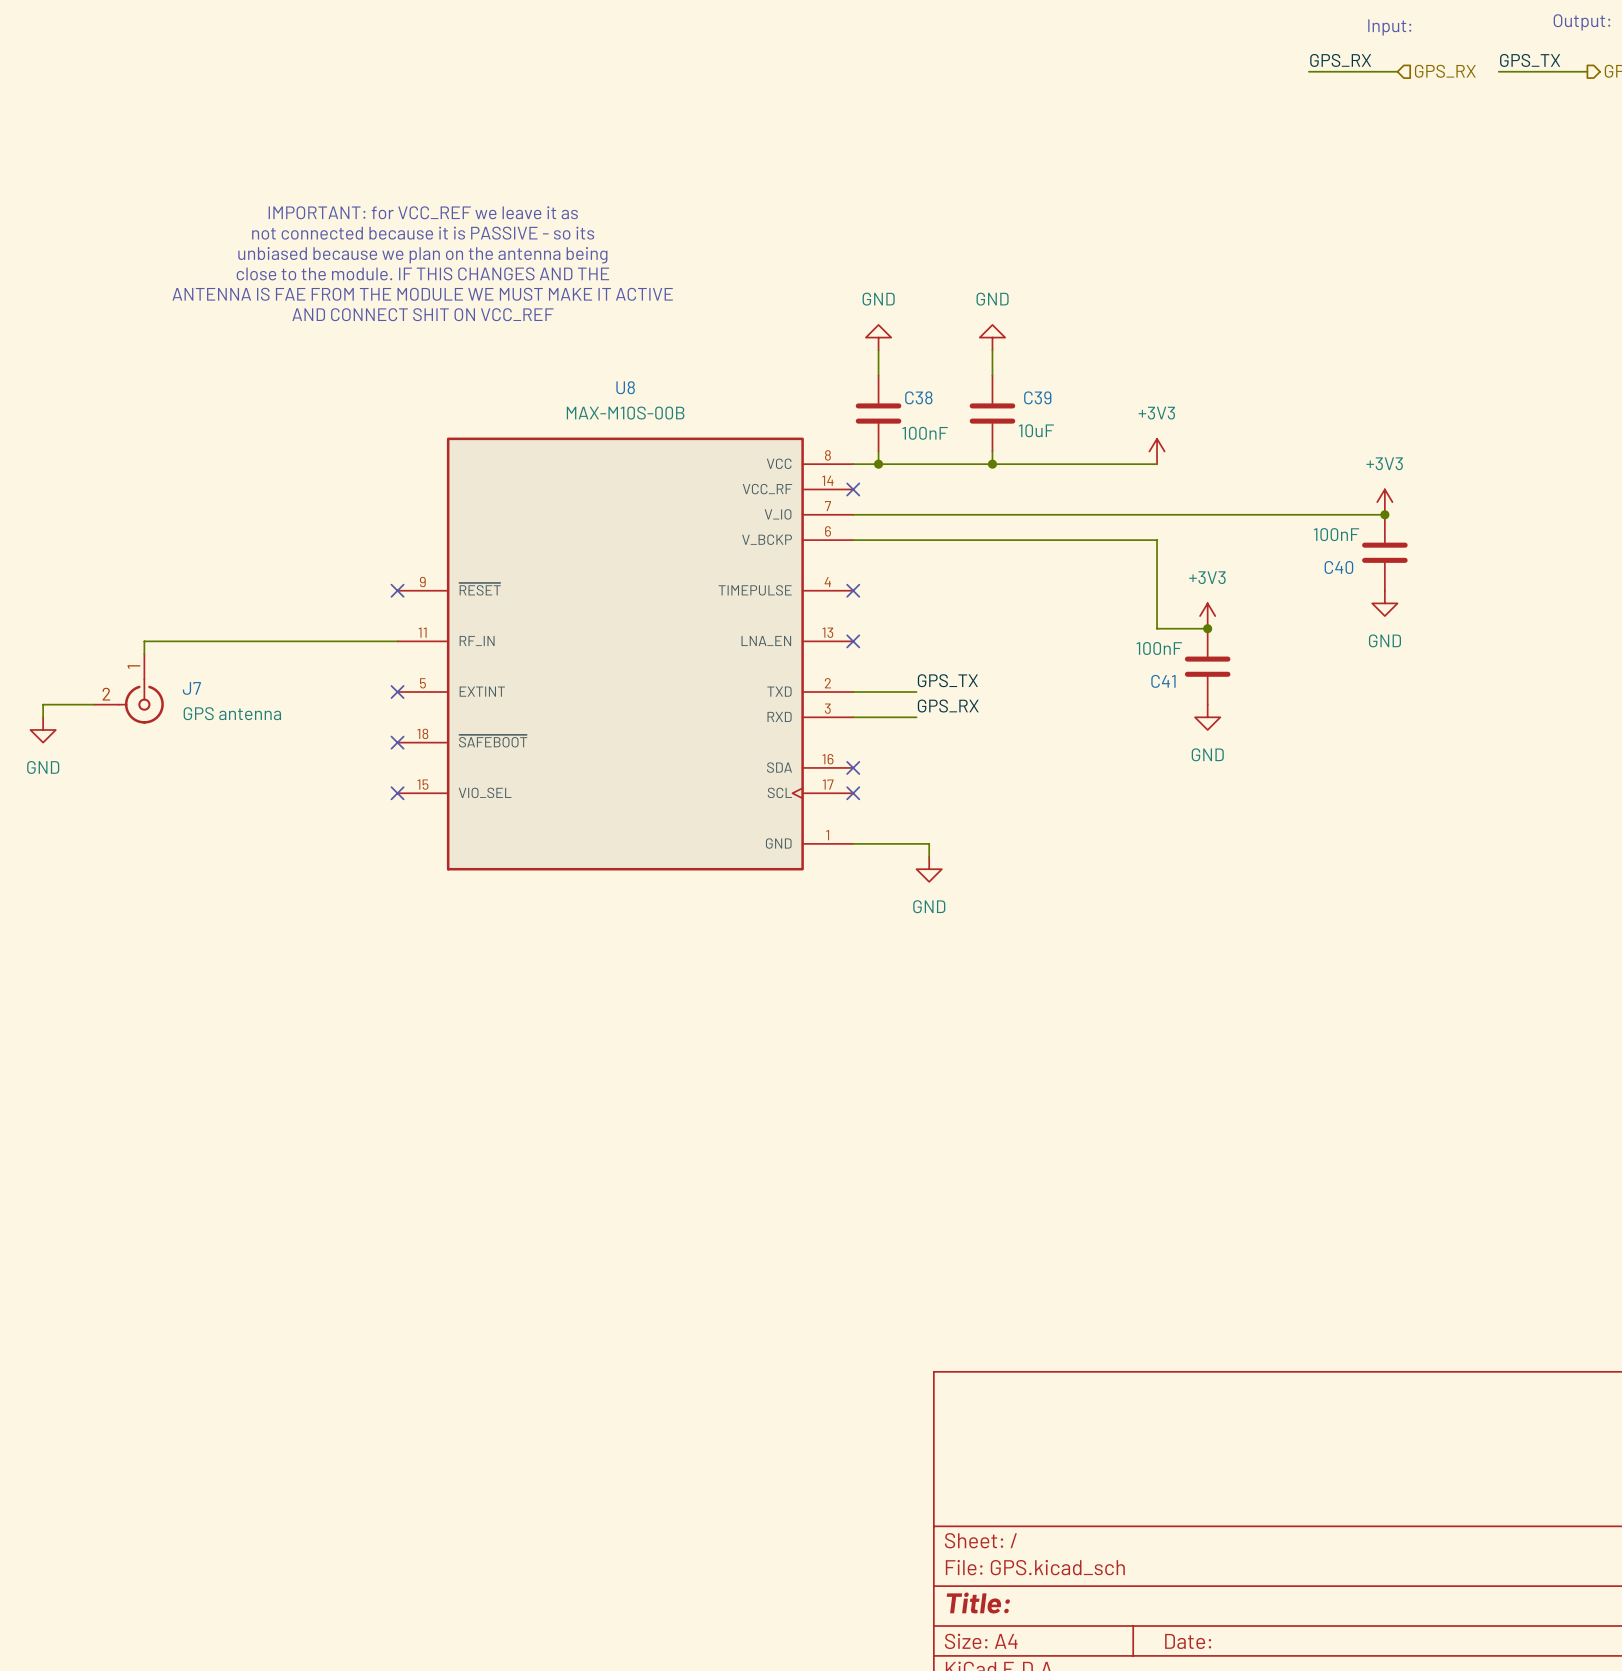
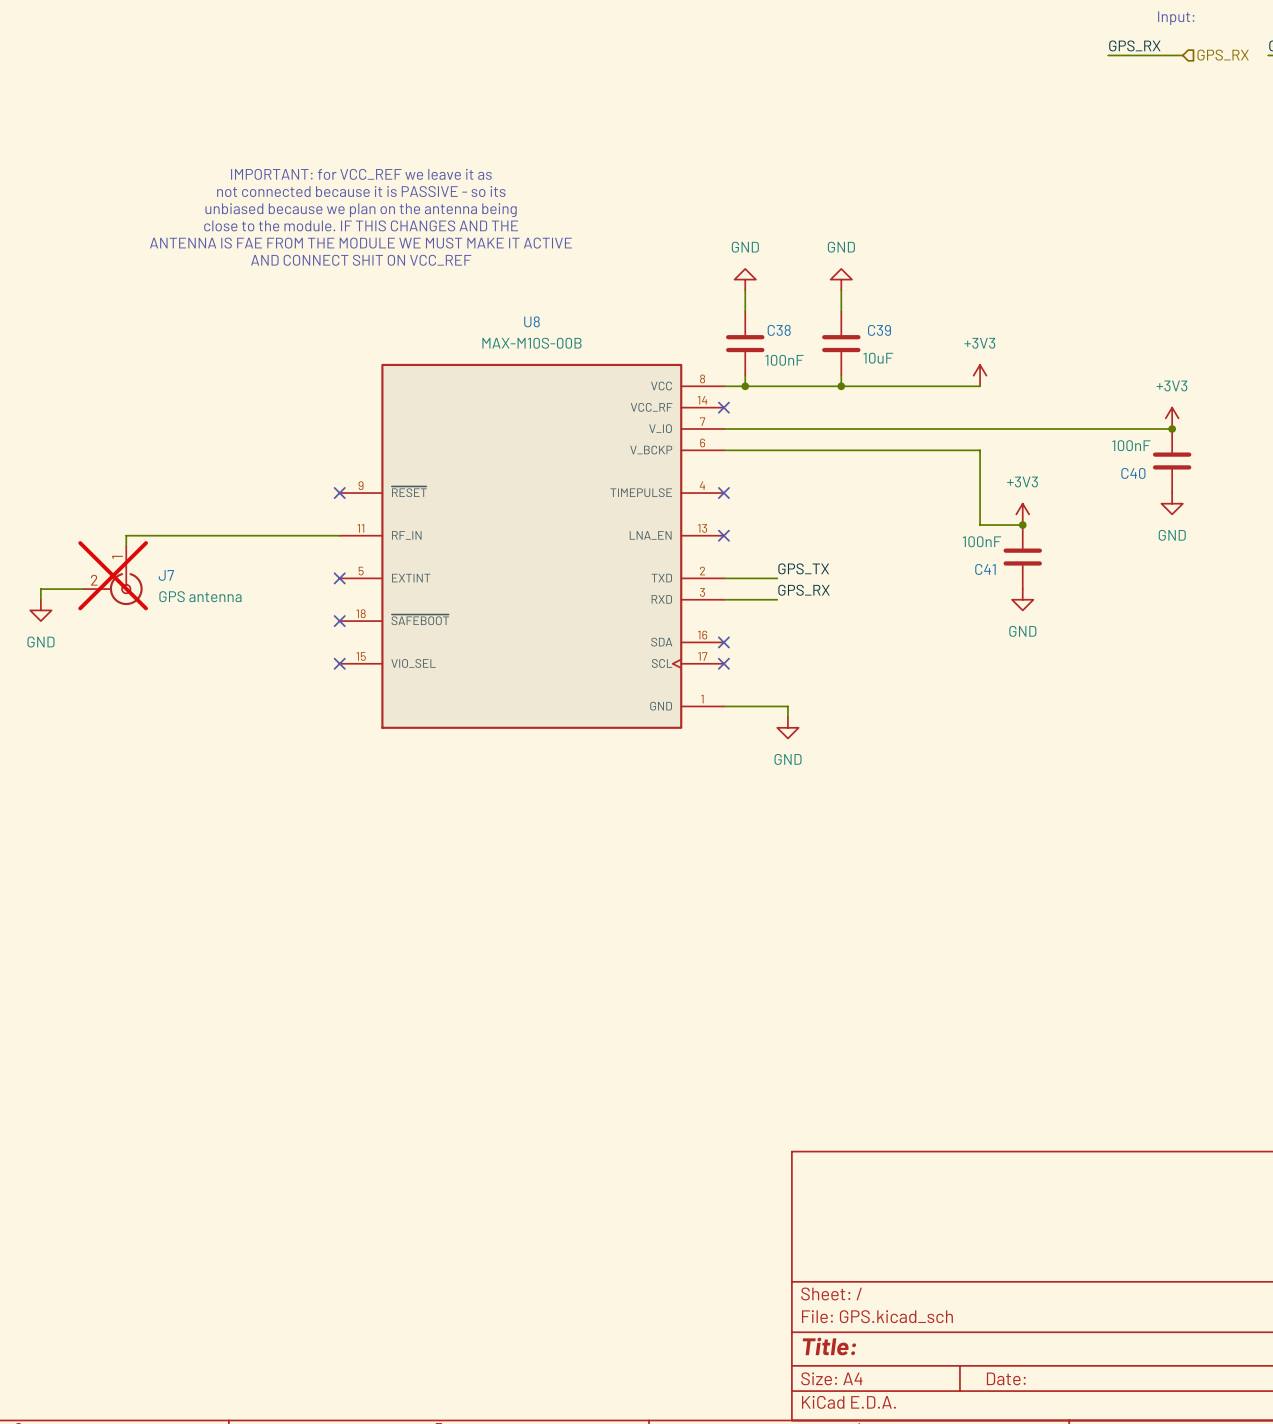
J7 do-not-place cross: none -> (113, 575)

